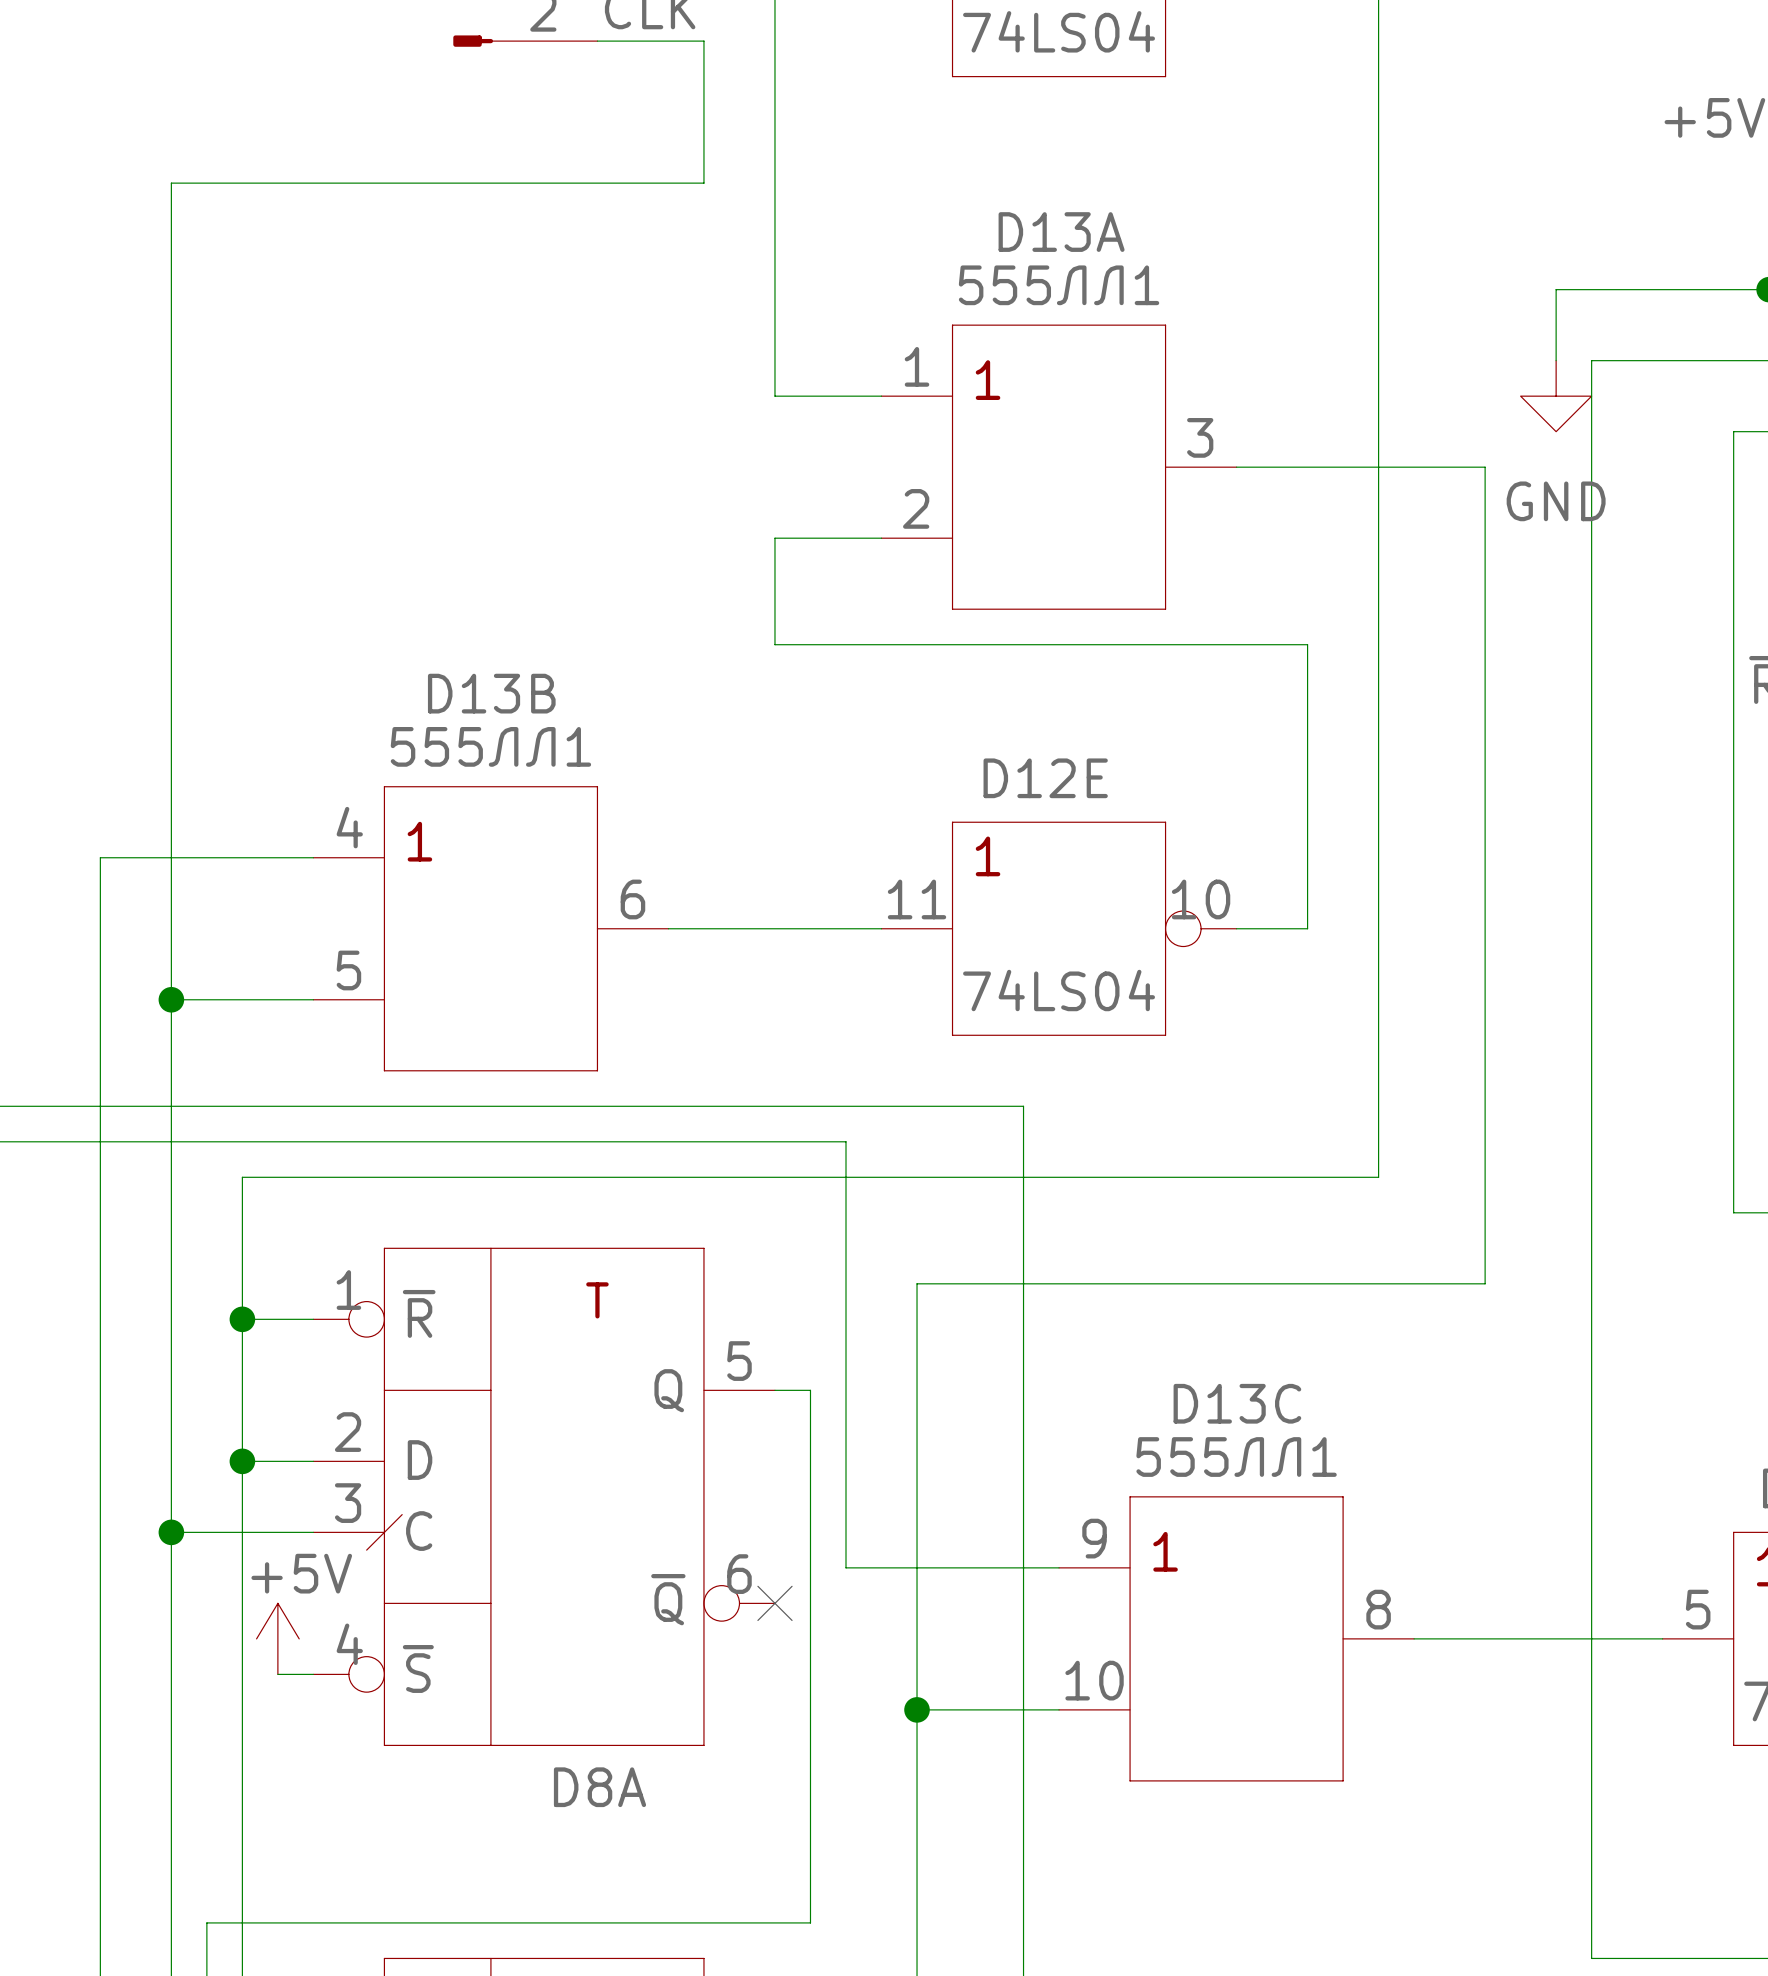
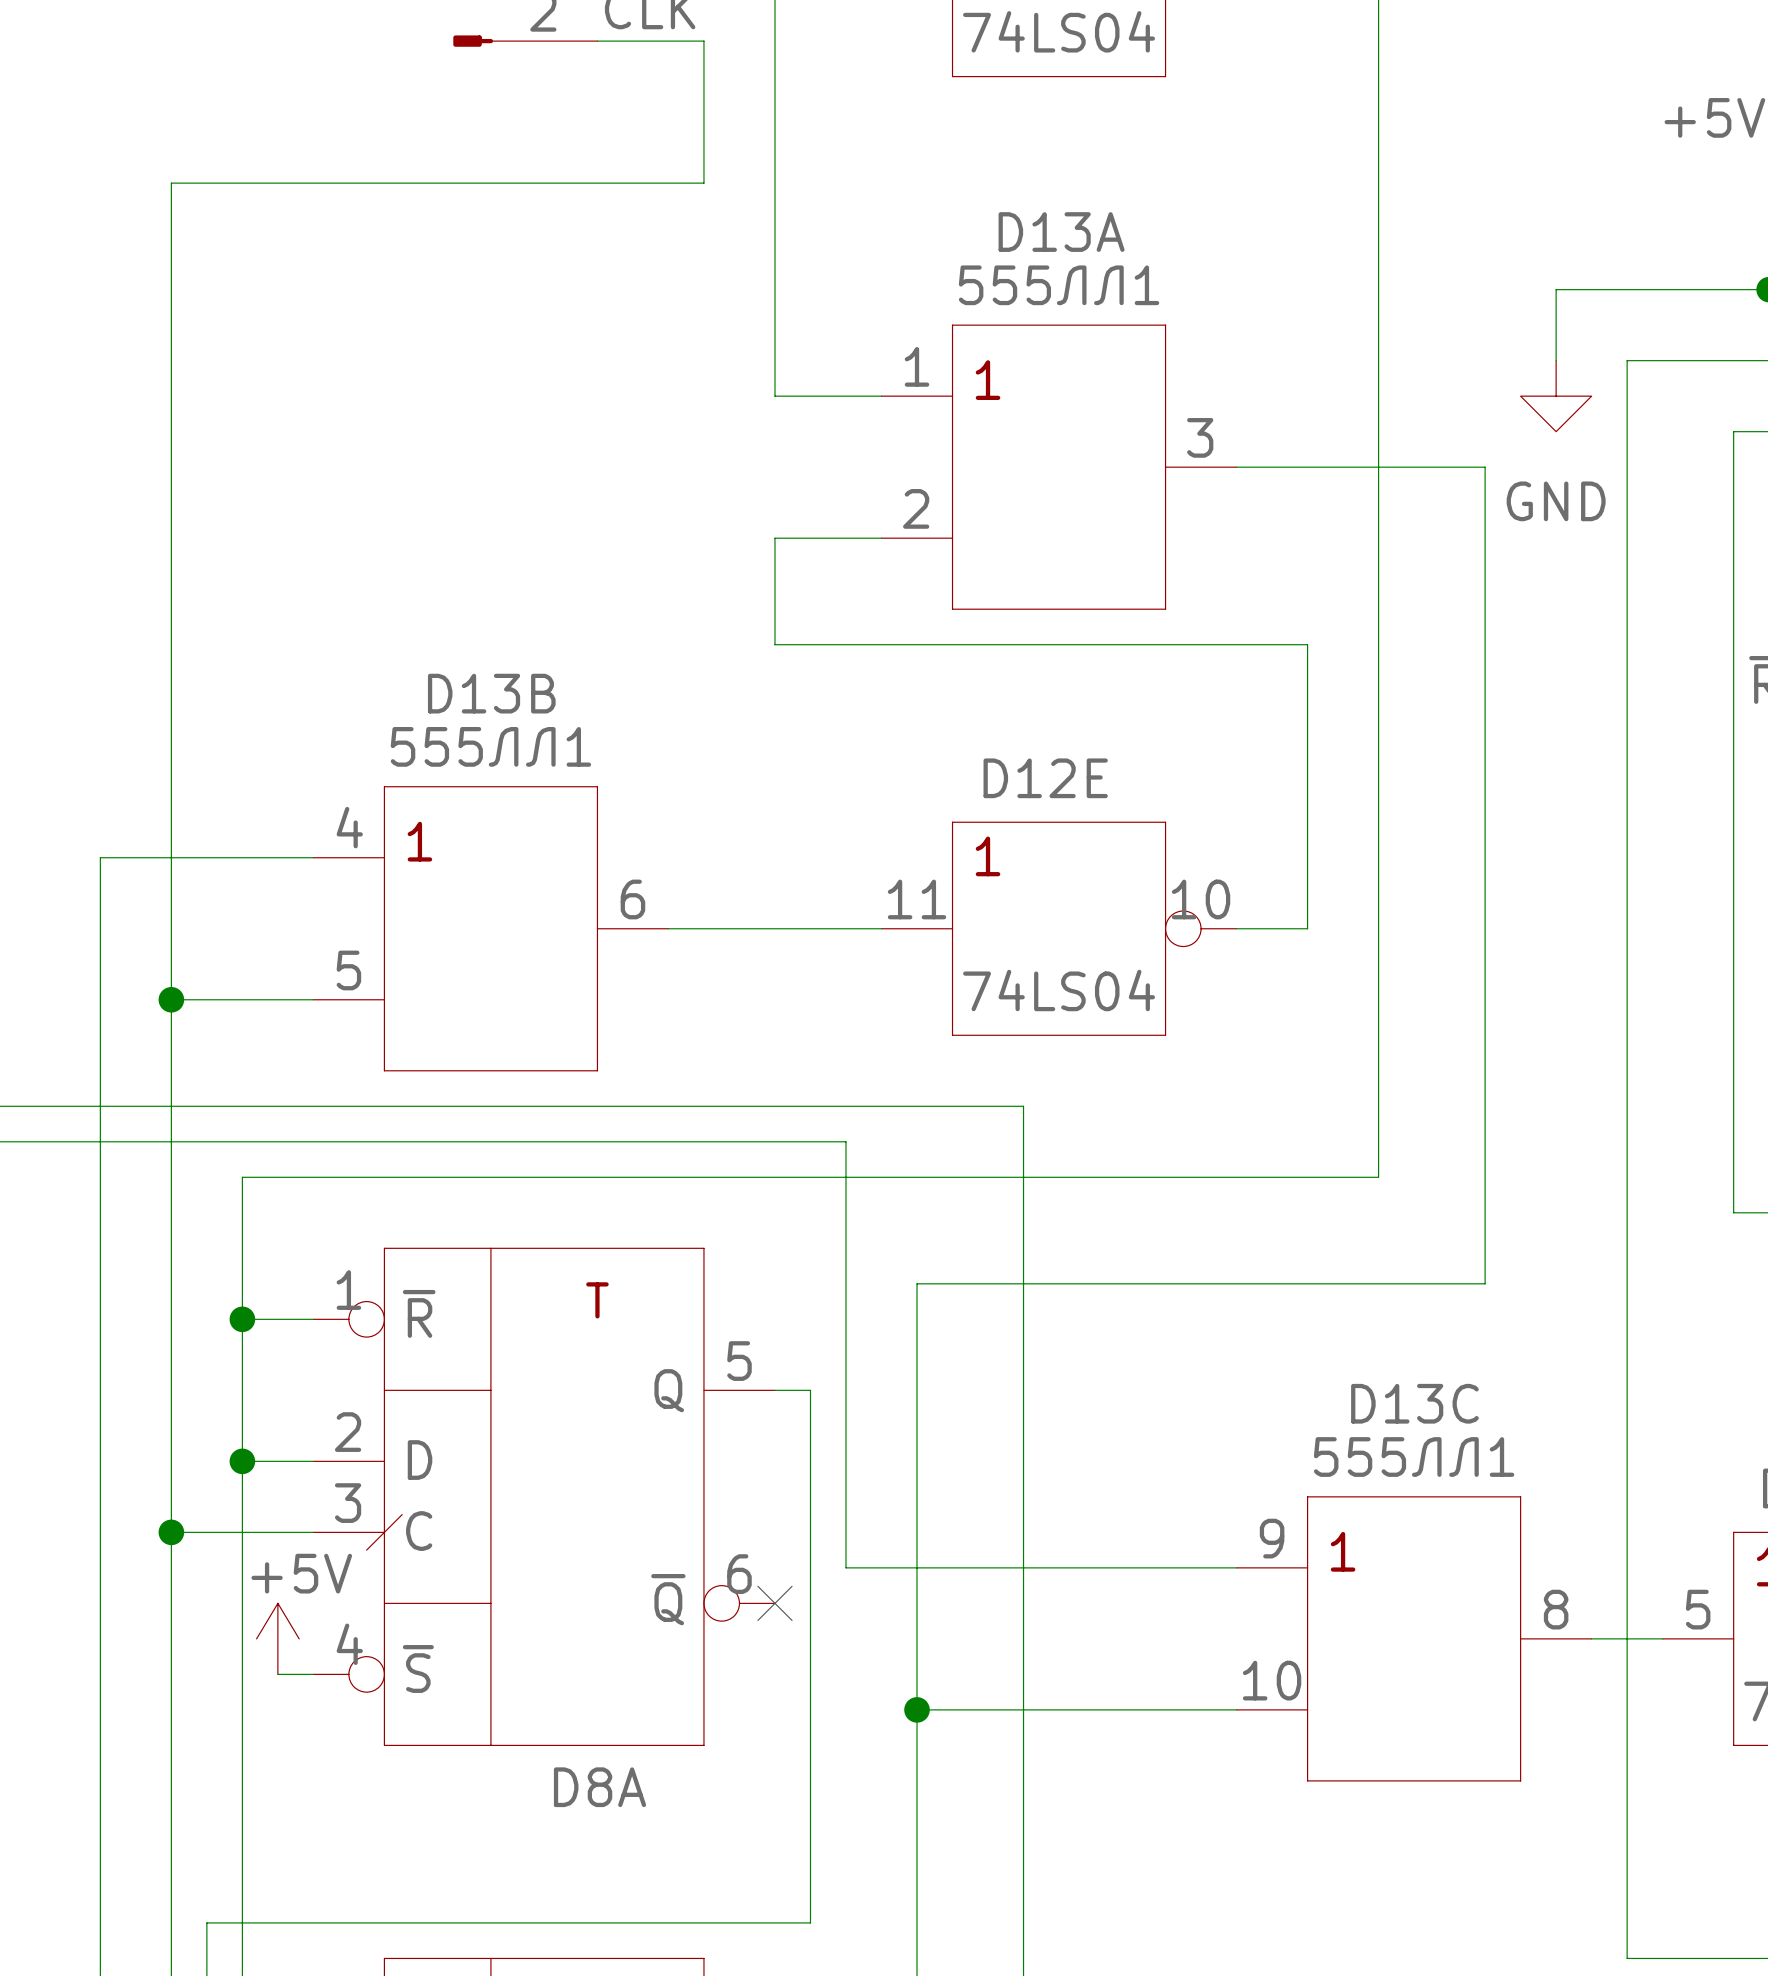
wire: (1627, 360) (1591, 360) (1591, 1958) (1627, 1958) -> (1627, 360) (1627, 1958)
wire: none -> (1059, 1567) (1236, 1567)
D13C position: (1236, 1638) -> (1414, 1638)
wire: (1414, 1638) (1591, 1638) -> (1059, 1709) (1236, 1709)

